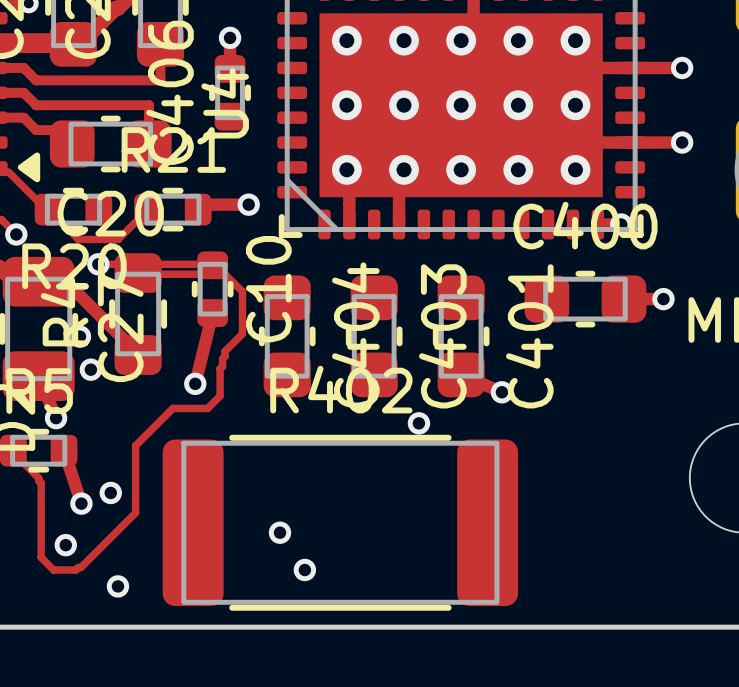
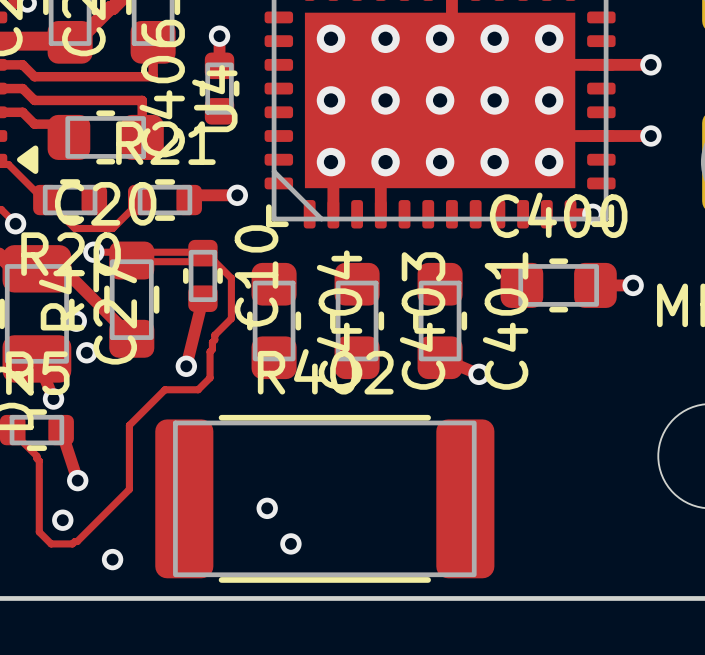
via: (418, 423) -> none
via: (110, 492) -> none

